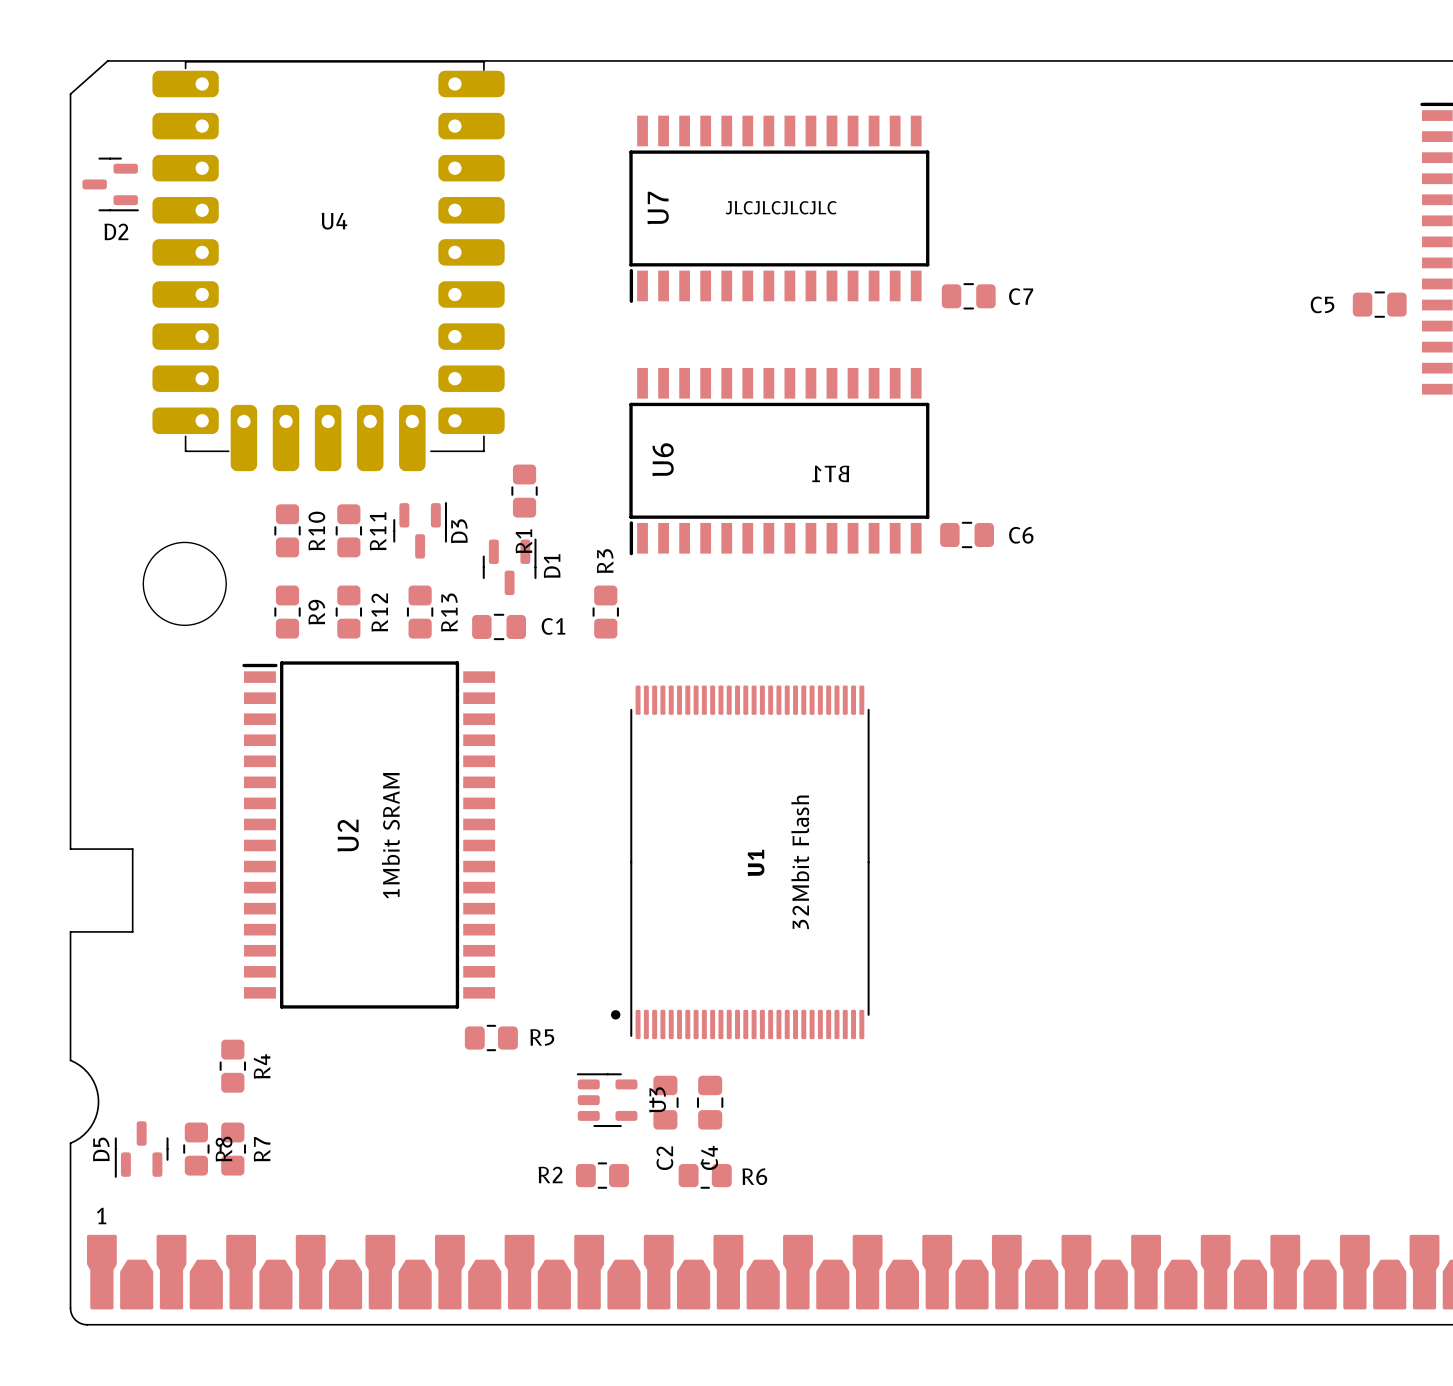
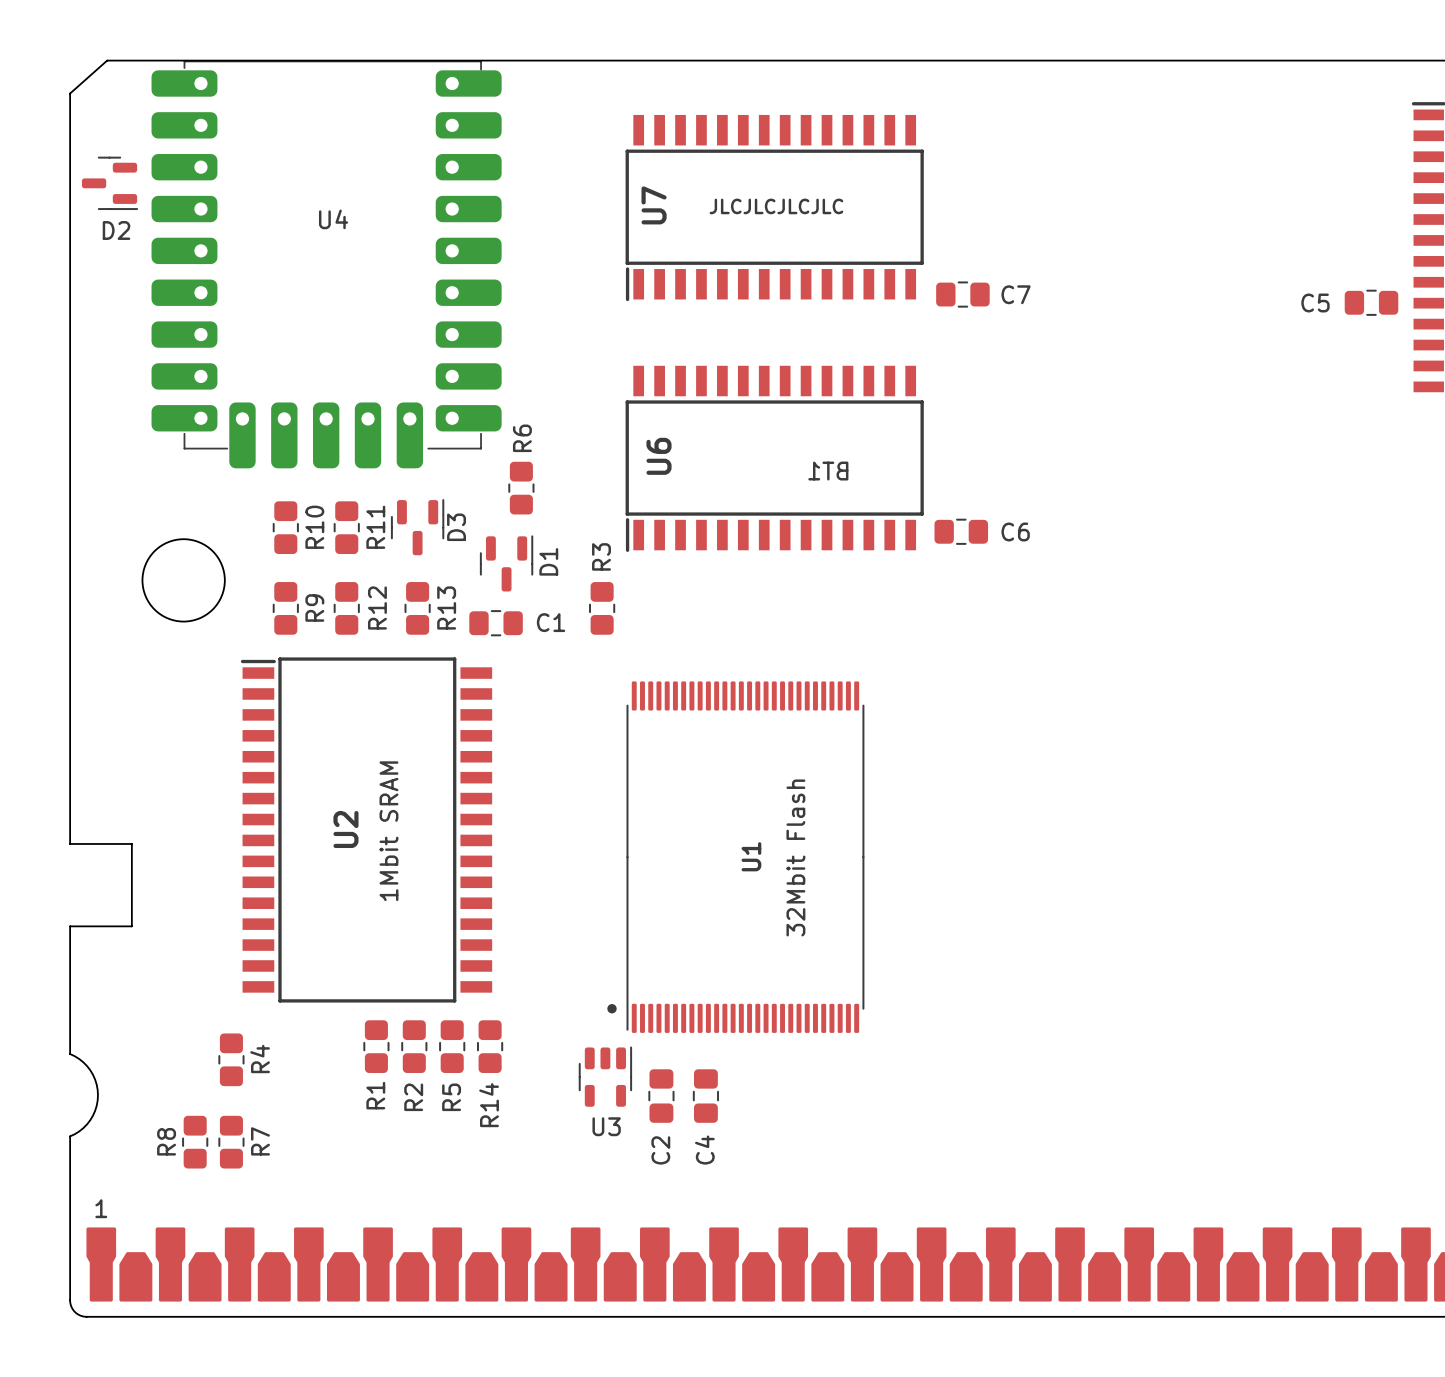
R1 name: R1 (523, 541) -> R6 (522, 438)
R5 rotation: 0° (491, 1038) -> 90° clockwise (452, 1046)
R5 position: (491, 1038) -> (452, 1046)
R1: none -> (376, 1046)
R14: none -> (490, 1046)
U3 rotation: 0° (607, 1100) -> 90° clockwise (605, 1076)
D5: (141, 1149) -> none
R8 name position: R8 (224, 1149) -> R8 (166, 1141)
R2 name position: R2 (550, 1174) -> R2 (413, 1097)
R2 rotation: 0° (602, 1175) -> 90° clockwise (414, 1046)
R2 position: (602, 1175) -> (414, 1046)
R6: (705, 1175) -> none

